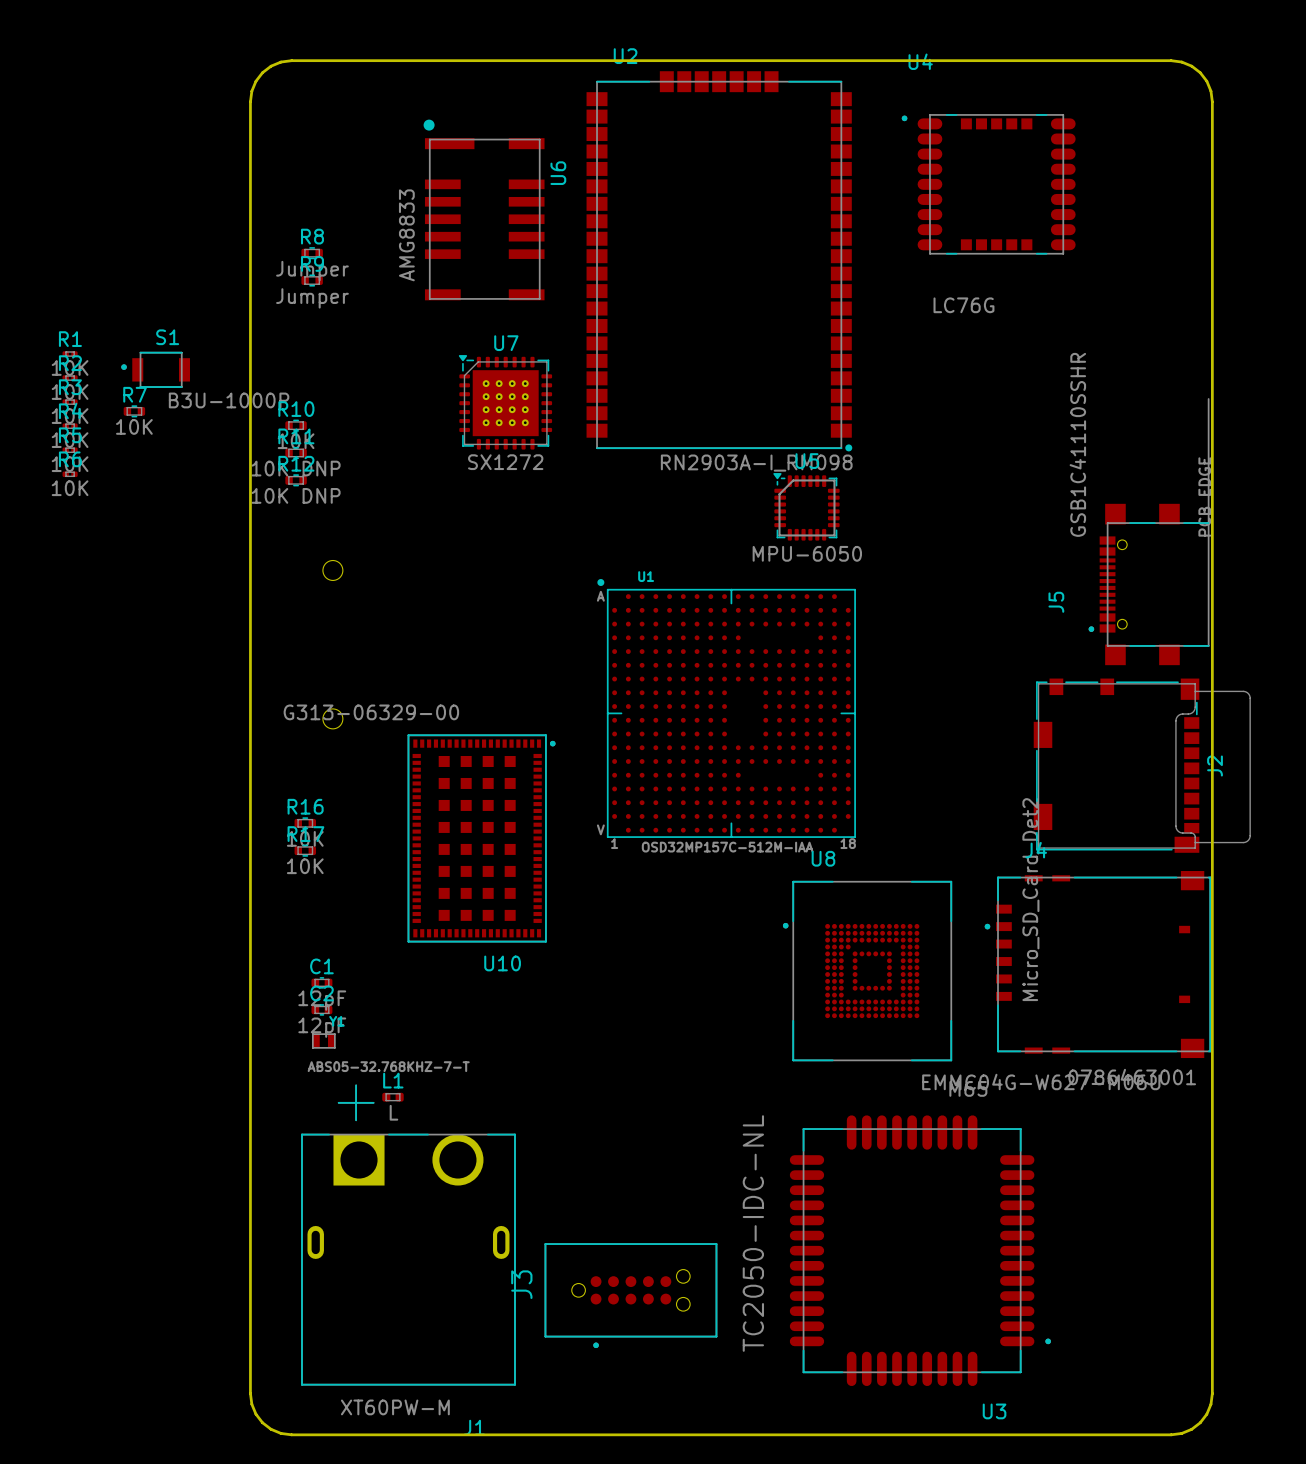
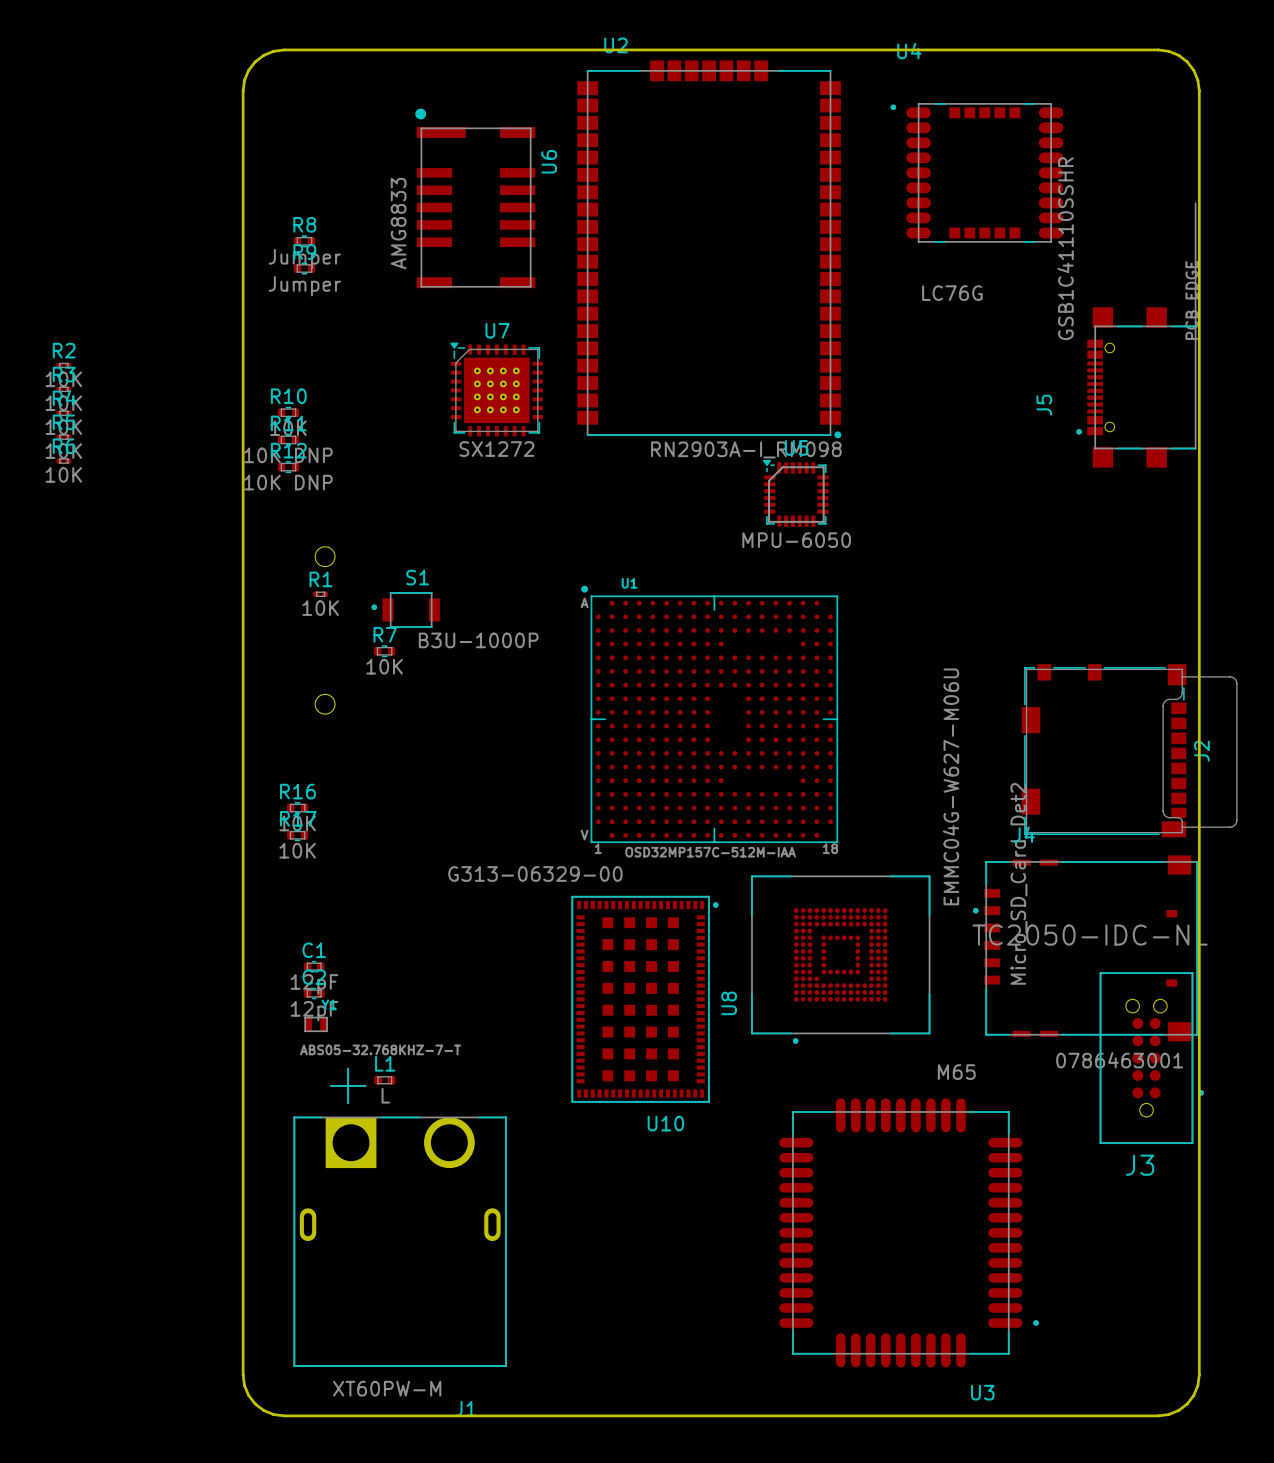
R1 position: (70, 354) -> (320, 594)
S1 position: (155, 369) -> (405, 609)
R7 position: (134, 411) -> (384, 651)
J5 position: (1149, 531) -> (1136, 334)
U1 position: (726, 708) -> (709, 714)
U10 position: (481, 838) -> (644, 999)
U8 rotation: 0° (867, 971) -> 90° counterclockwise (840, 959)
J3 rotation: 0° (630, 1295) -> 90° counterclockwise (1151, 1058)
J3 position: (630, 1295) -> (1151, 1058)

